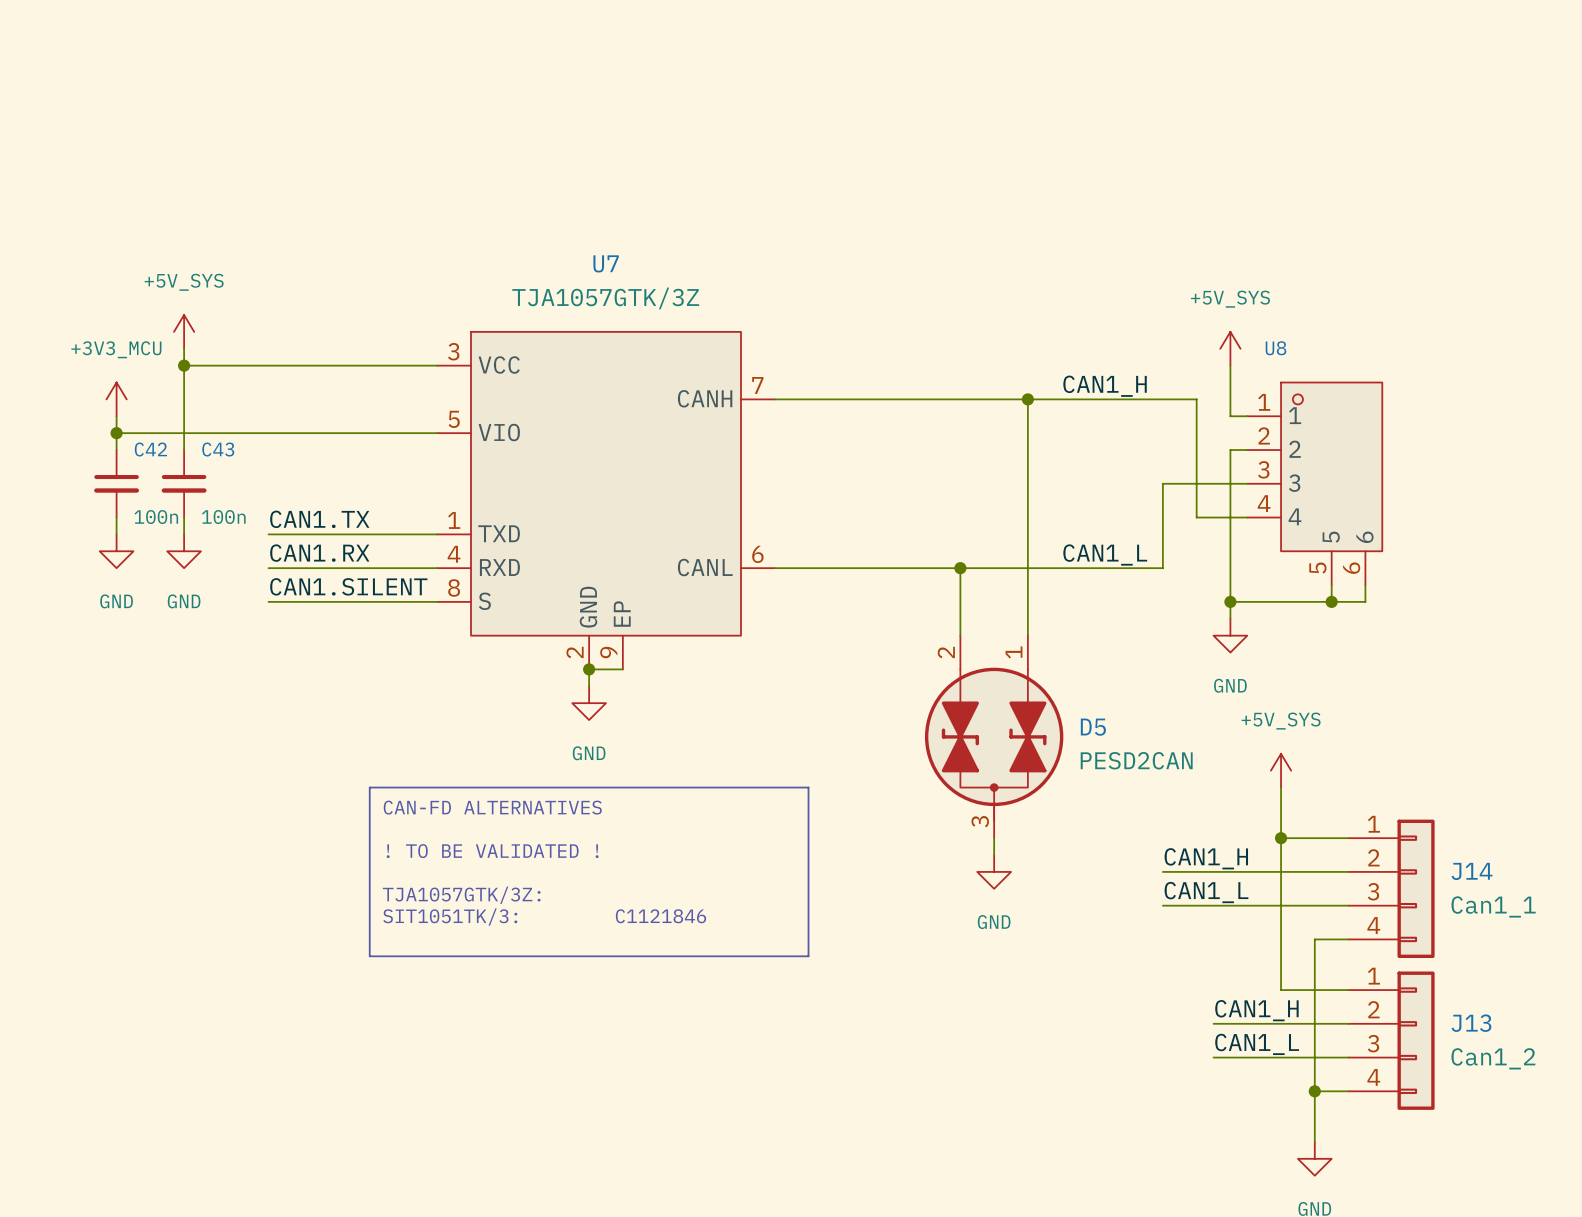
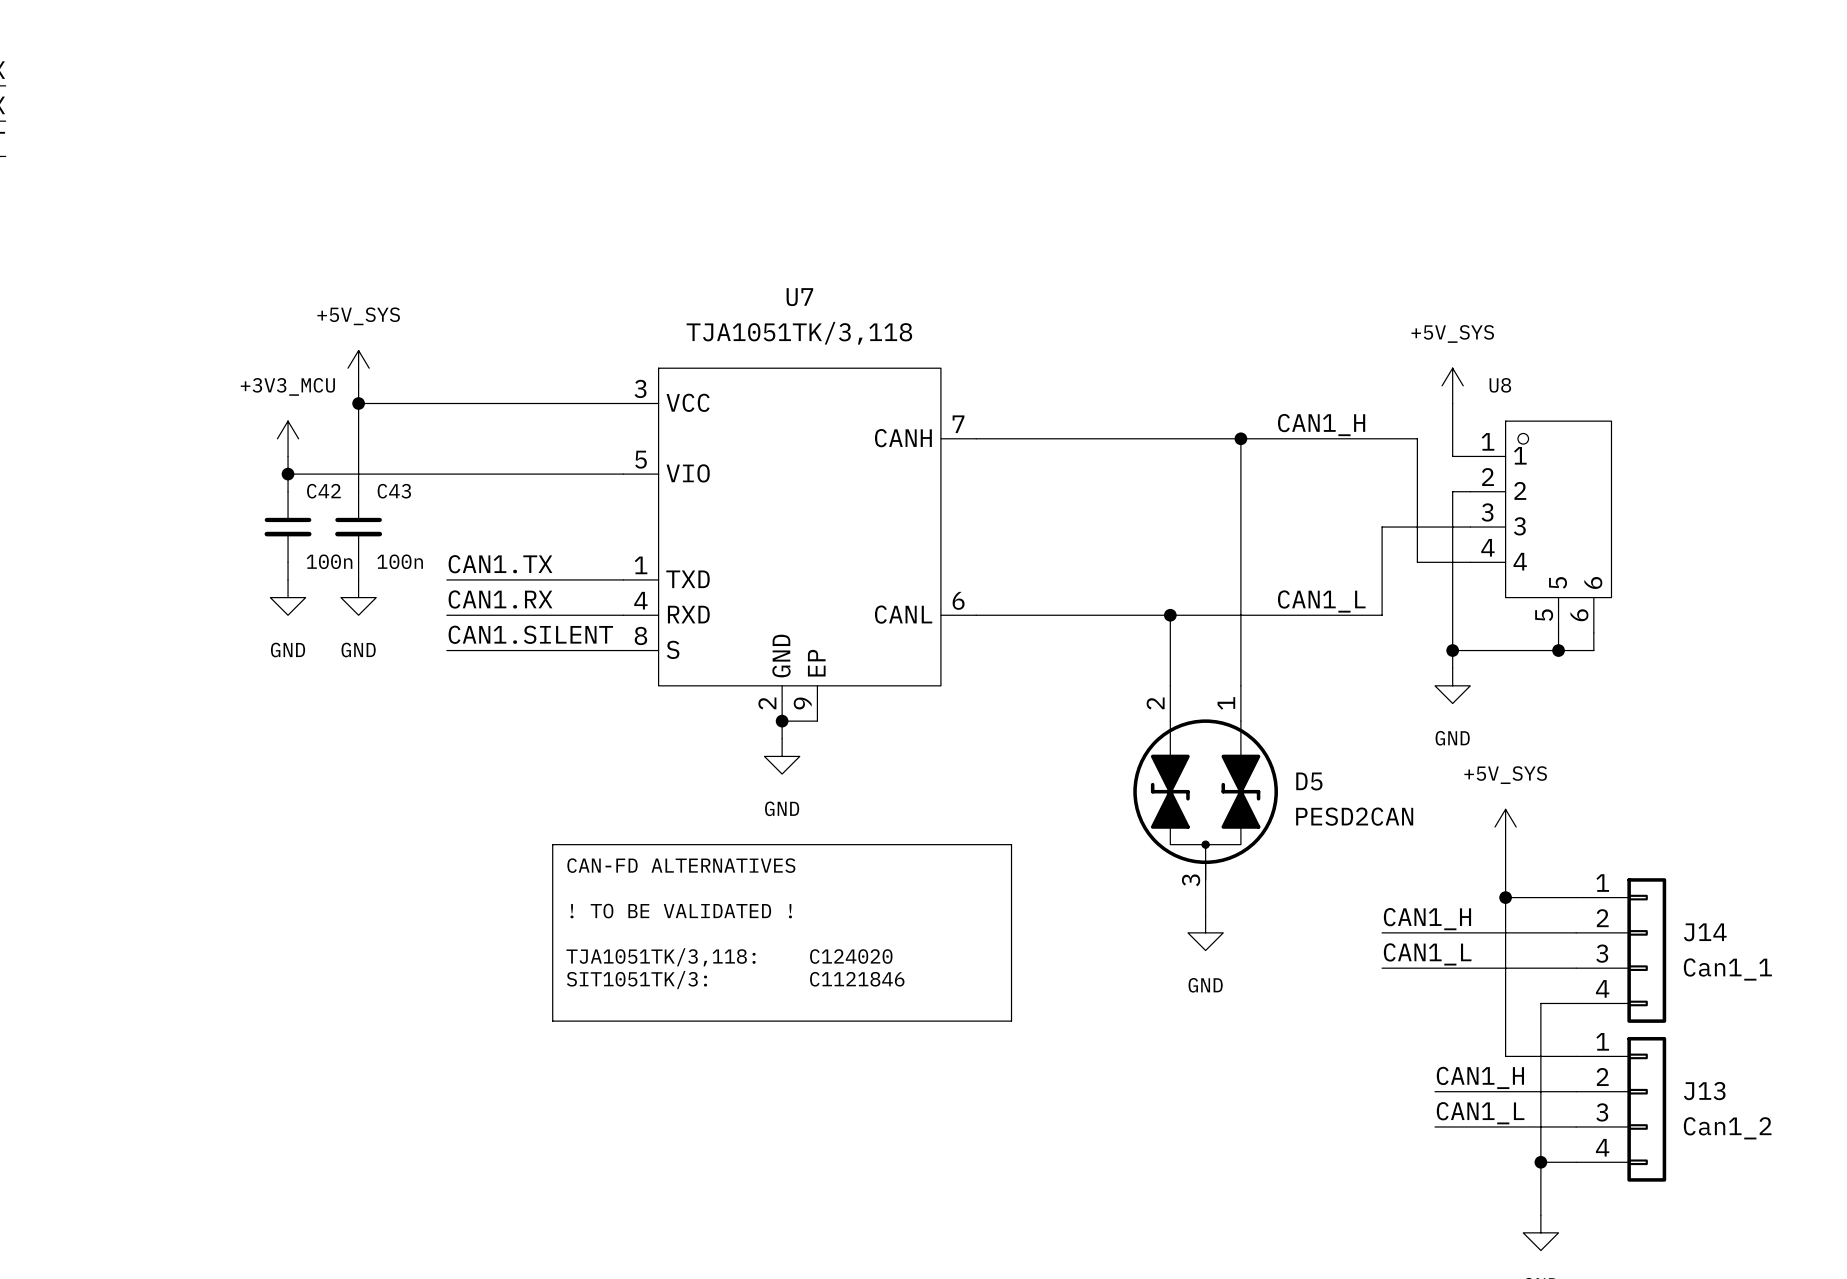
U7 value: TJA1057GTK/3Z (605, 298) -> TJA1051TK/3,118 (799, 333)
text: TJA1057GTK/3Z: (461, 895) -> TJA1051TK/3,118: C124020 (729, 957)

